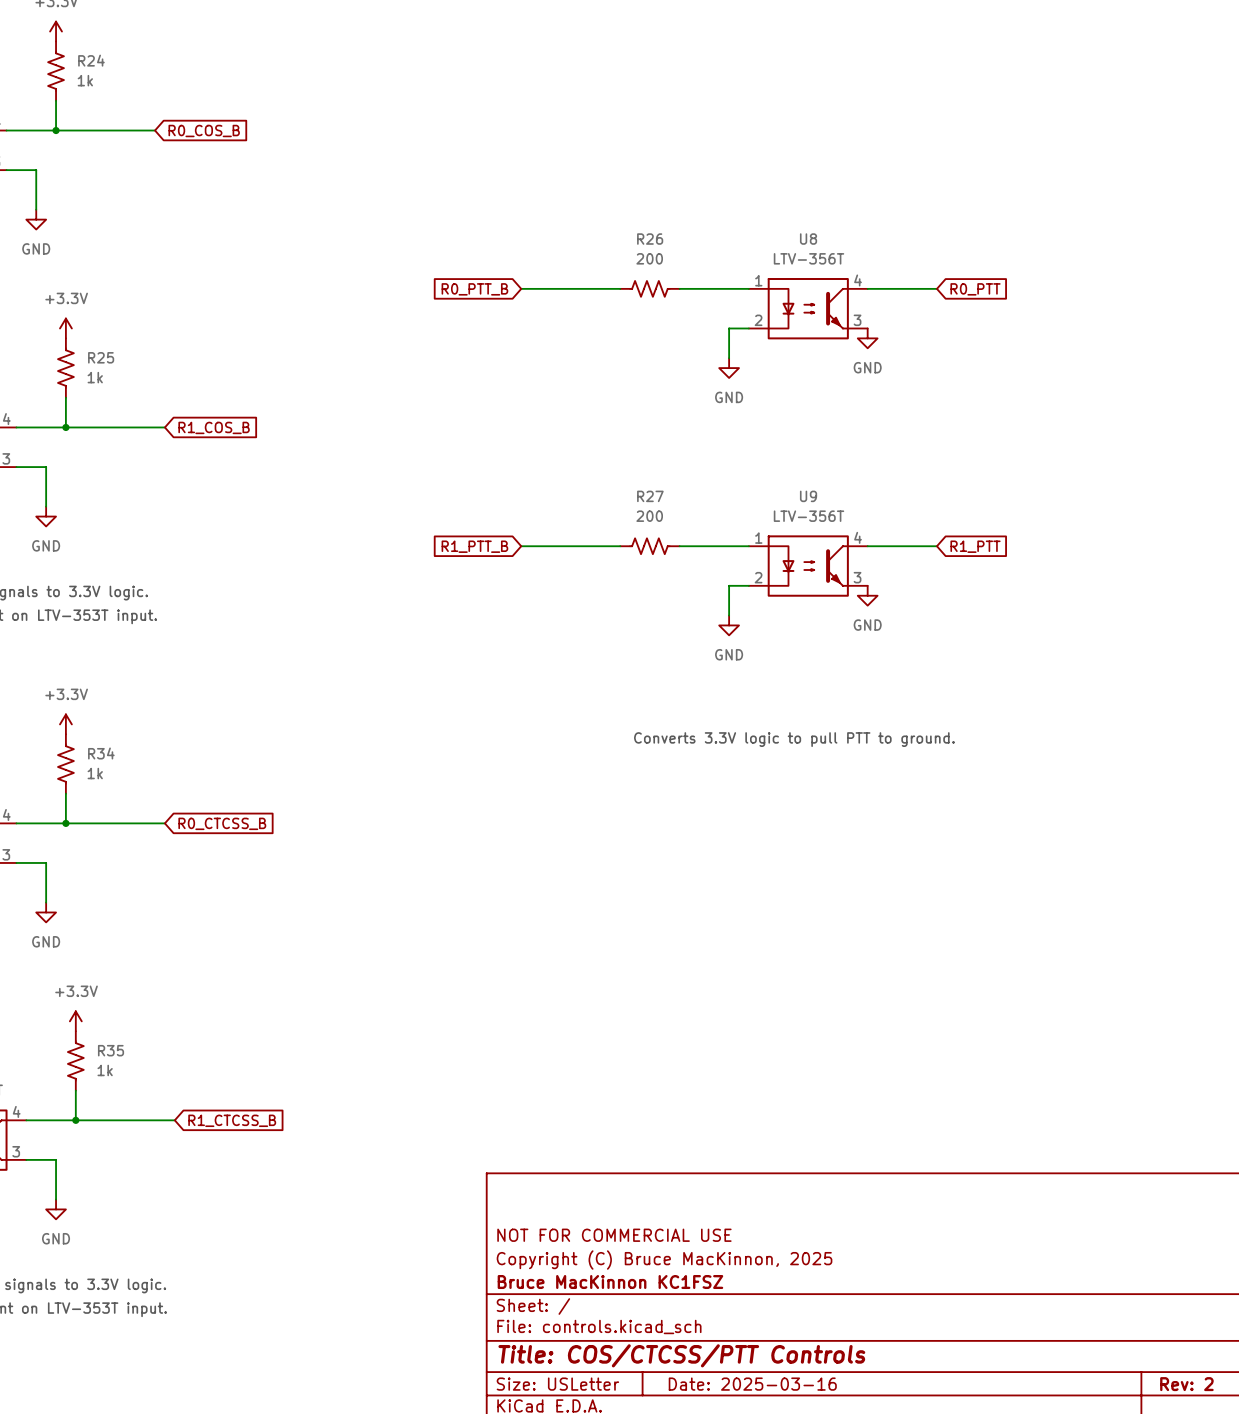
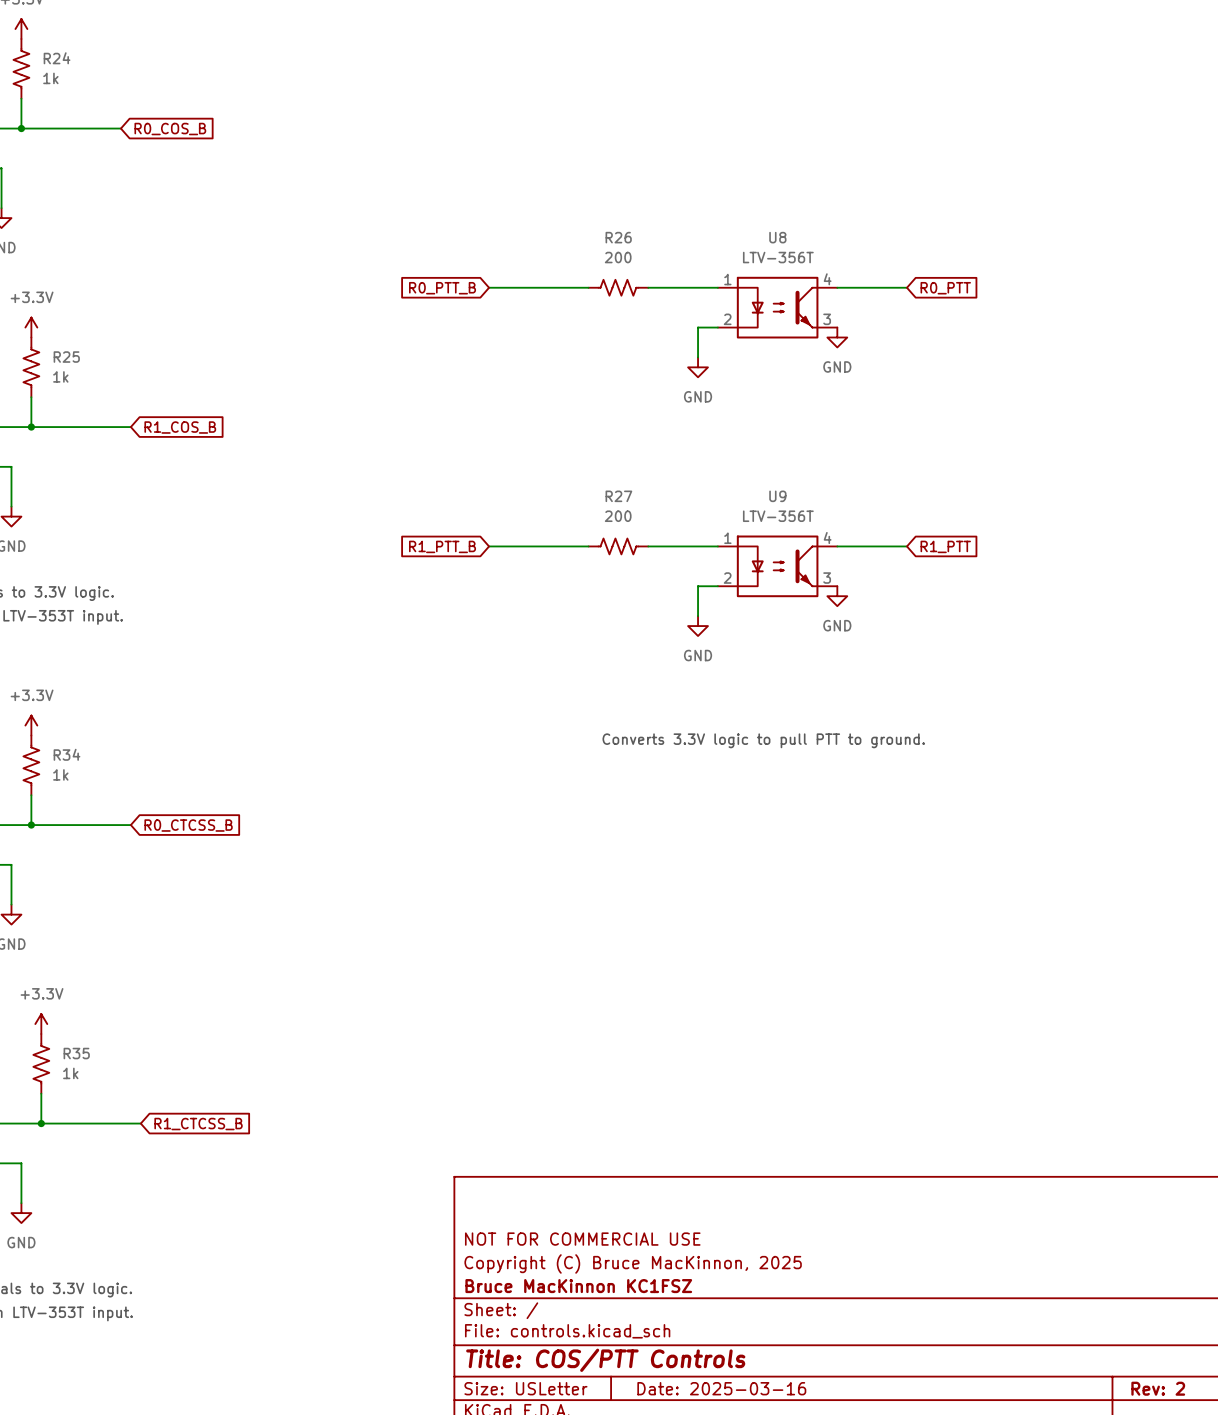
title block: Title: COS/CTCSS/PTT Controls (681, 1355) -> Title: COS/PTT Controls (605, 1360)

